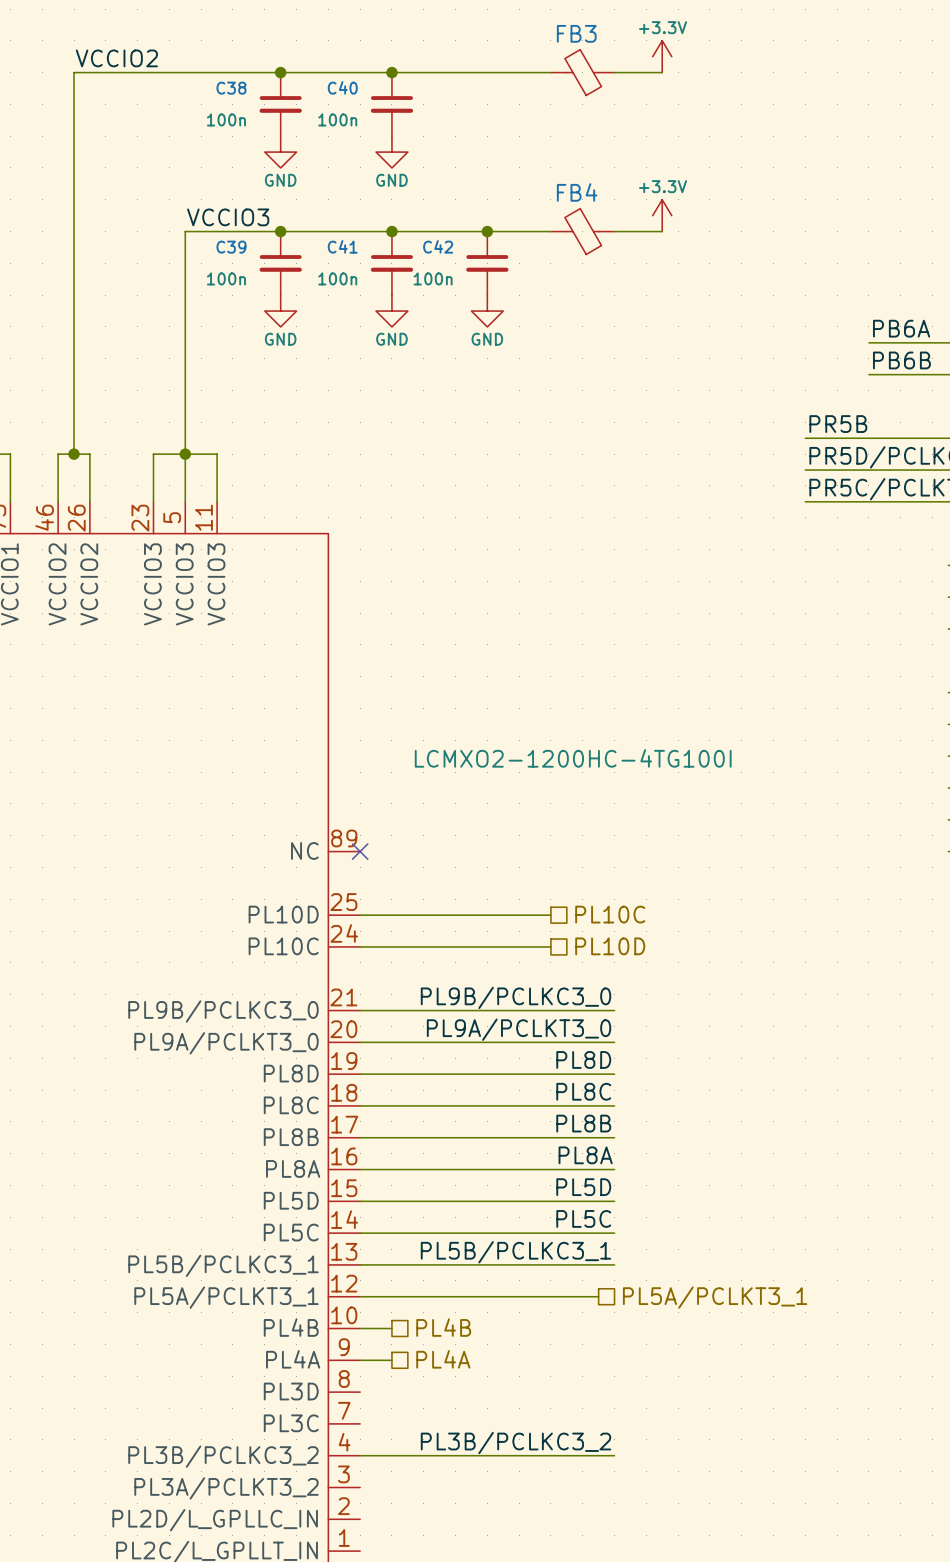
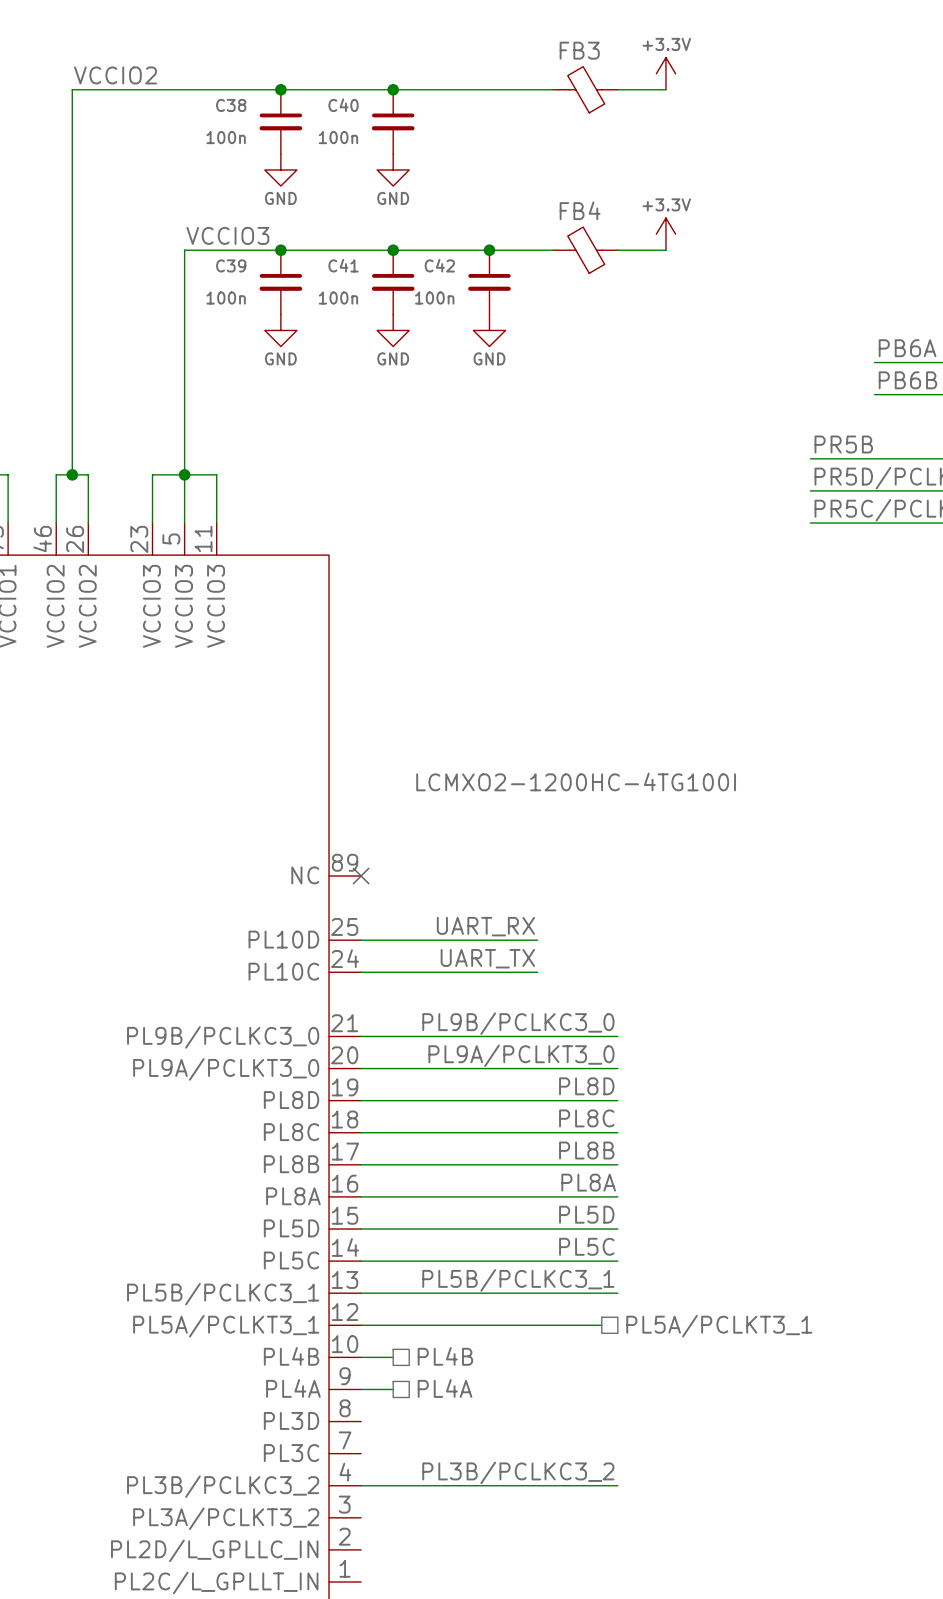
label: none -> UART_RX (485, 926)
hierarchical label: PL10C (610, 914) -> none
wire: (535, 915) (550, 915) -> none
label: none -> UART_TX (487, 958)
wire: (535, 946) (550, 946) -> none
hierarchical label: PL10D (610, 946) -> none

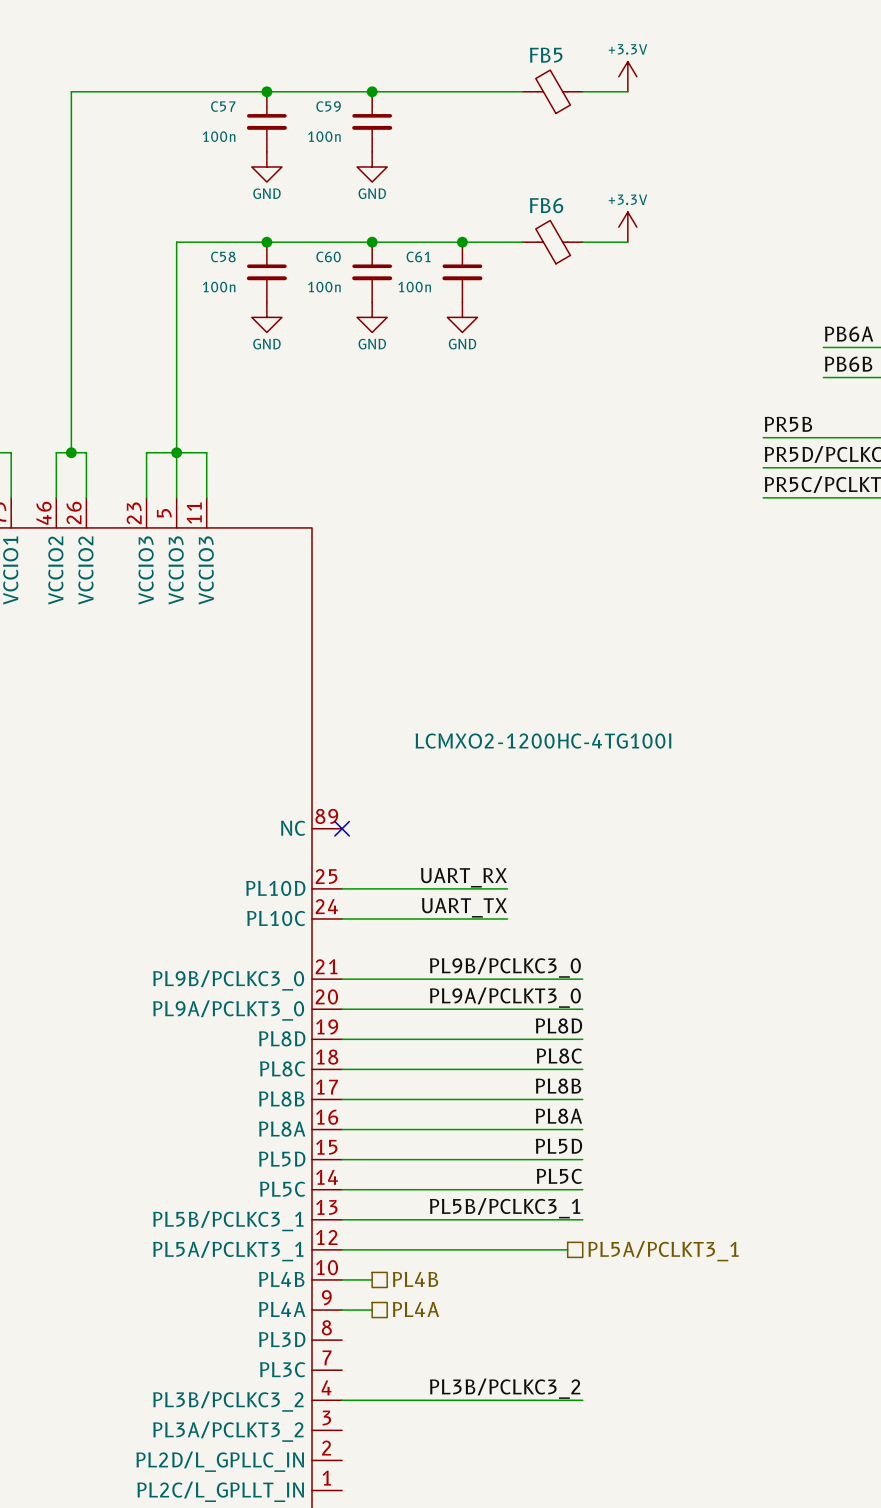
FB3 name: FB3 (579, 50) -> FB5 (546, 55)
label: VCCIO2 (115, 75) -> none
C38 name: C38 (231, 105) -> C57 (223, 106)
C40 name: C40 (343, 105) -> C59 (328, 106)
FB4 name: FB4 (580, 210) -> FB6 (546, 205)
label: VCCIO3 (227, 235) -> none
C39 name: C39 (231, 265) -> C58 (223, 256)
C41 name: C41 (343, 265) -> C60 (328, 256)
C42 name: C42 (439, 265) -> C61 (418, 256)

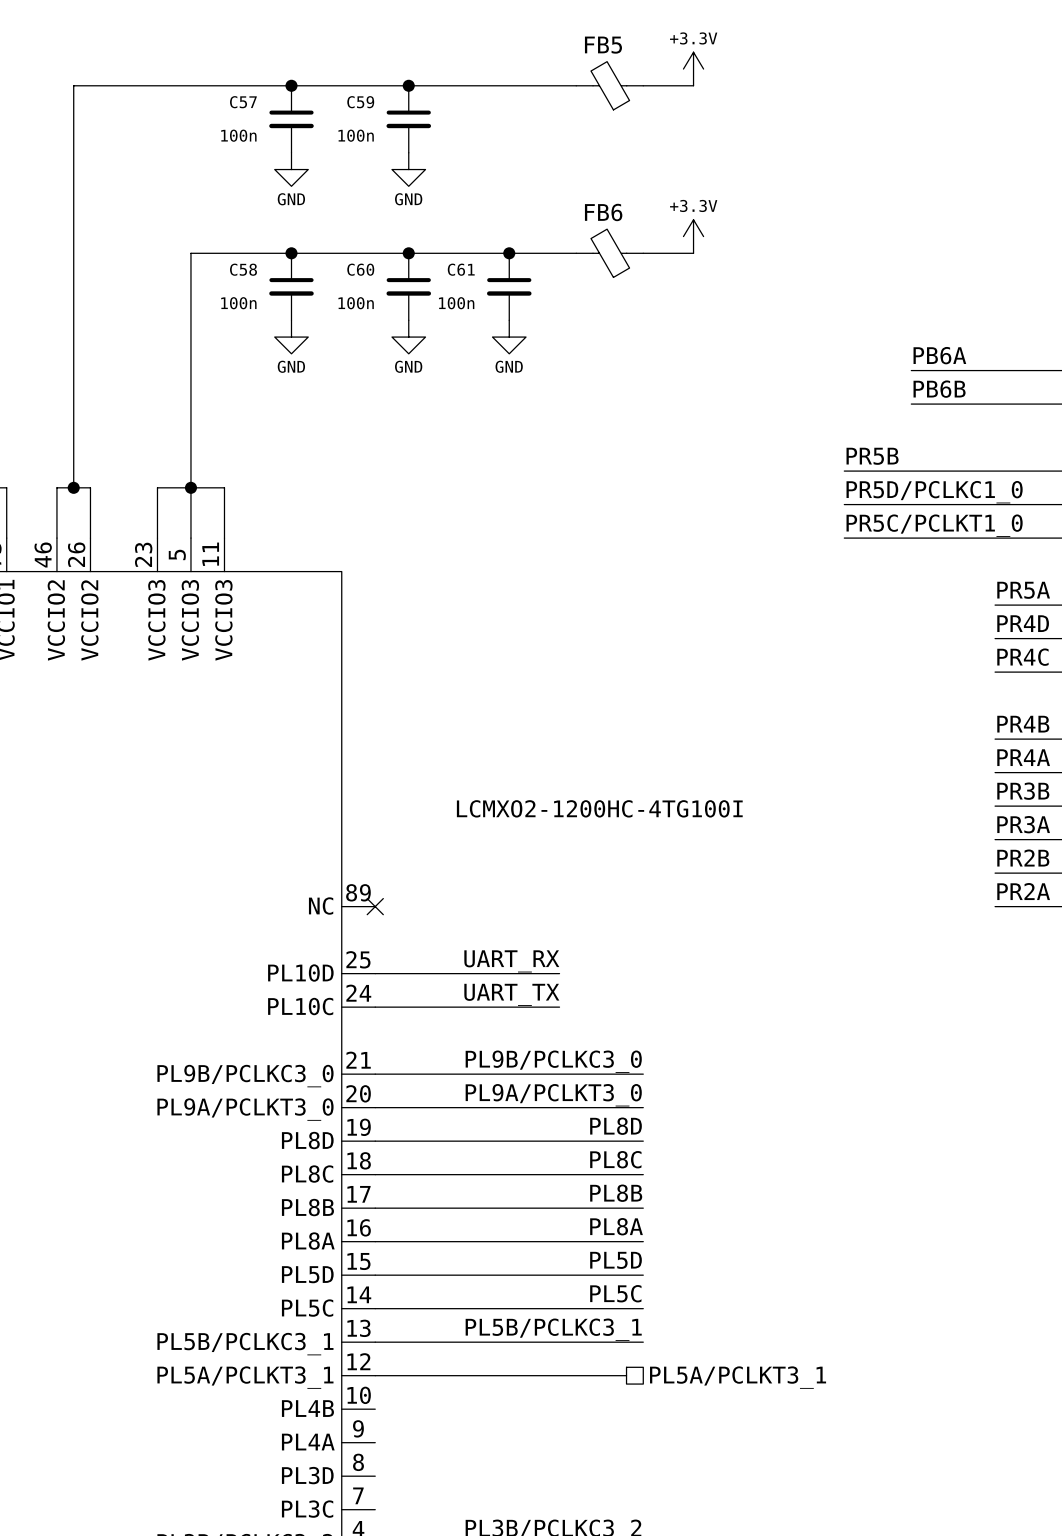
wire: (342, 1279) (372, 1279) -> none
hierarchical label: PL4B (415, 1279) -> none
hierarchical label: PL4A (415, 1309) -> none
wire: (342, 1310) (372, 1310) -> none

